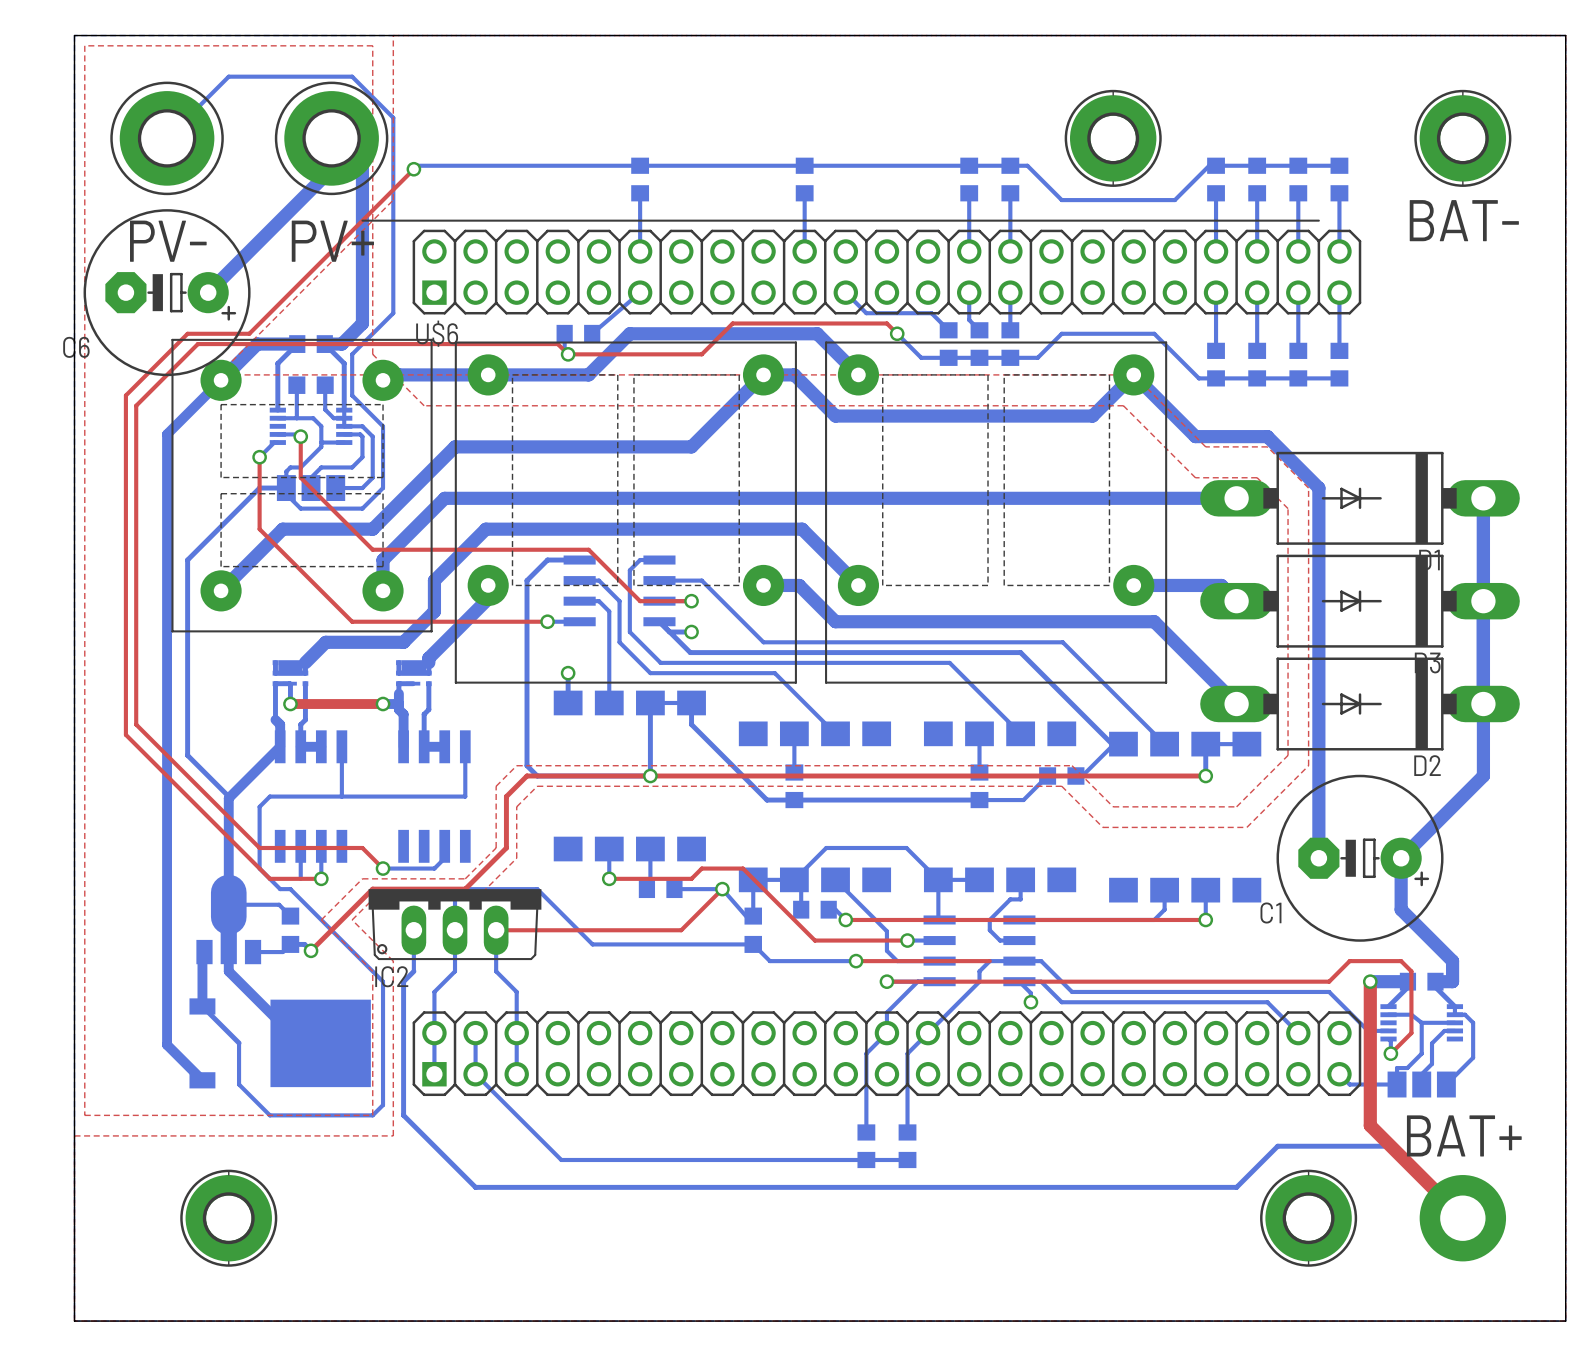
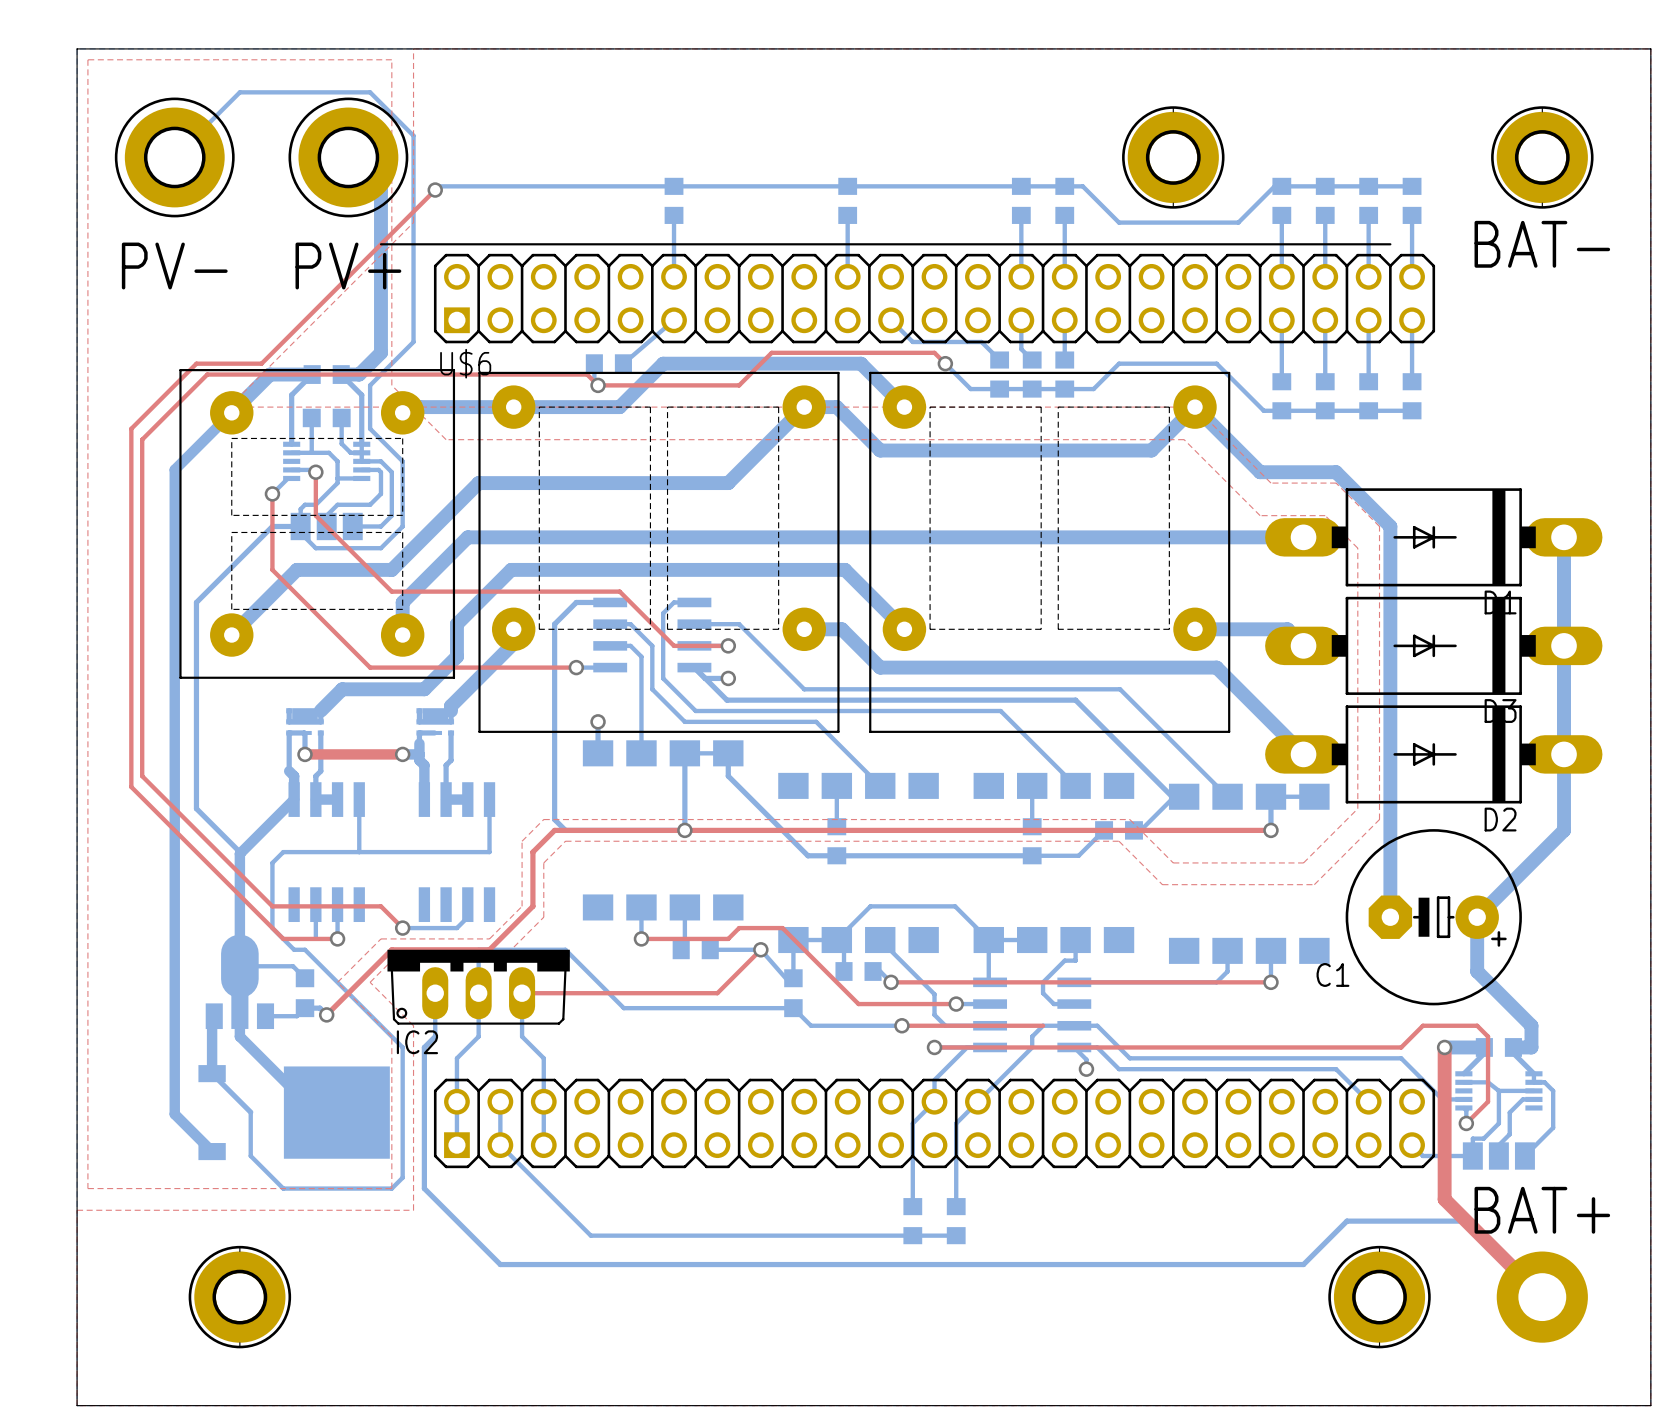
bottom track: (331, 138) (331, 169) (208, 292) -> none
C6: (167, 292) -> none

